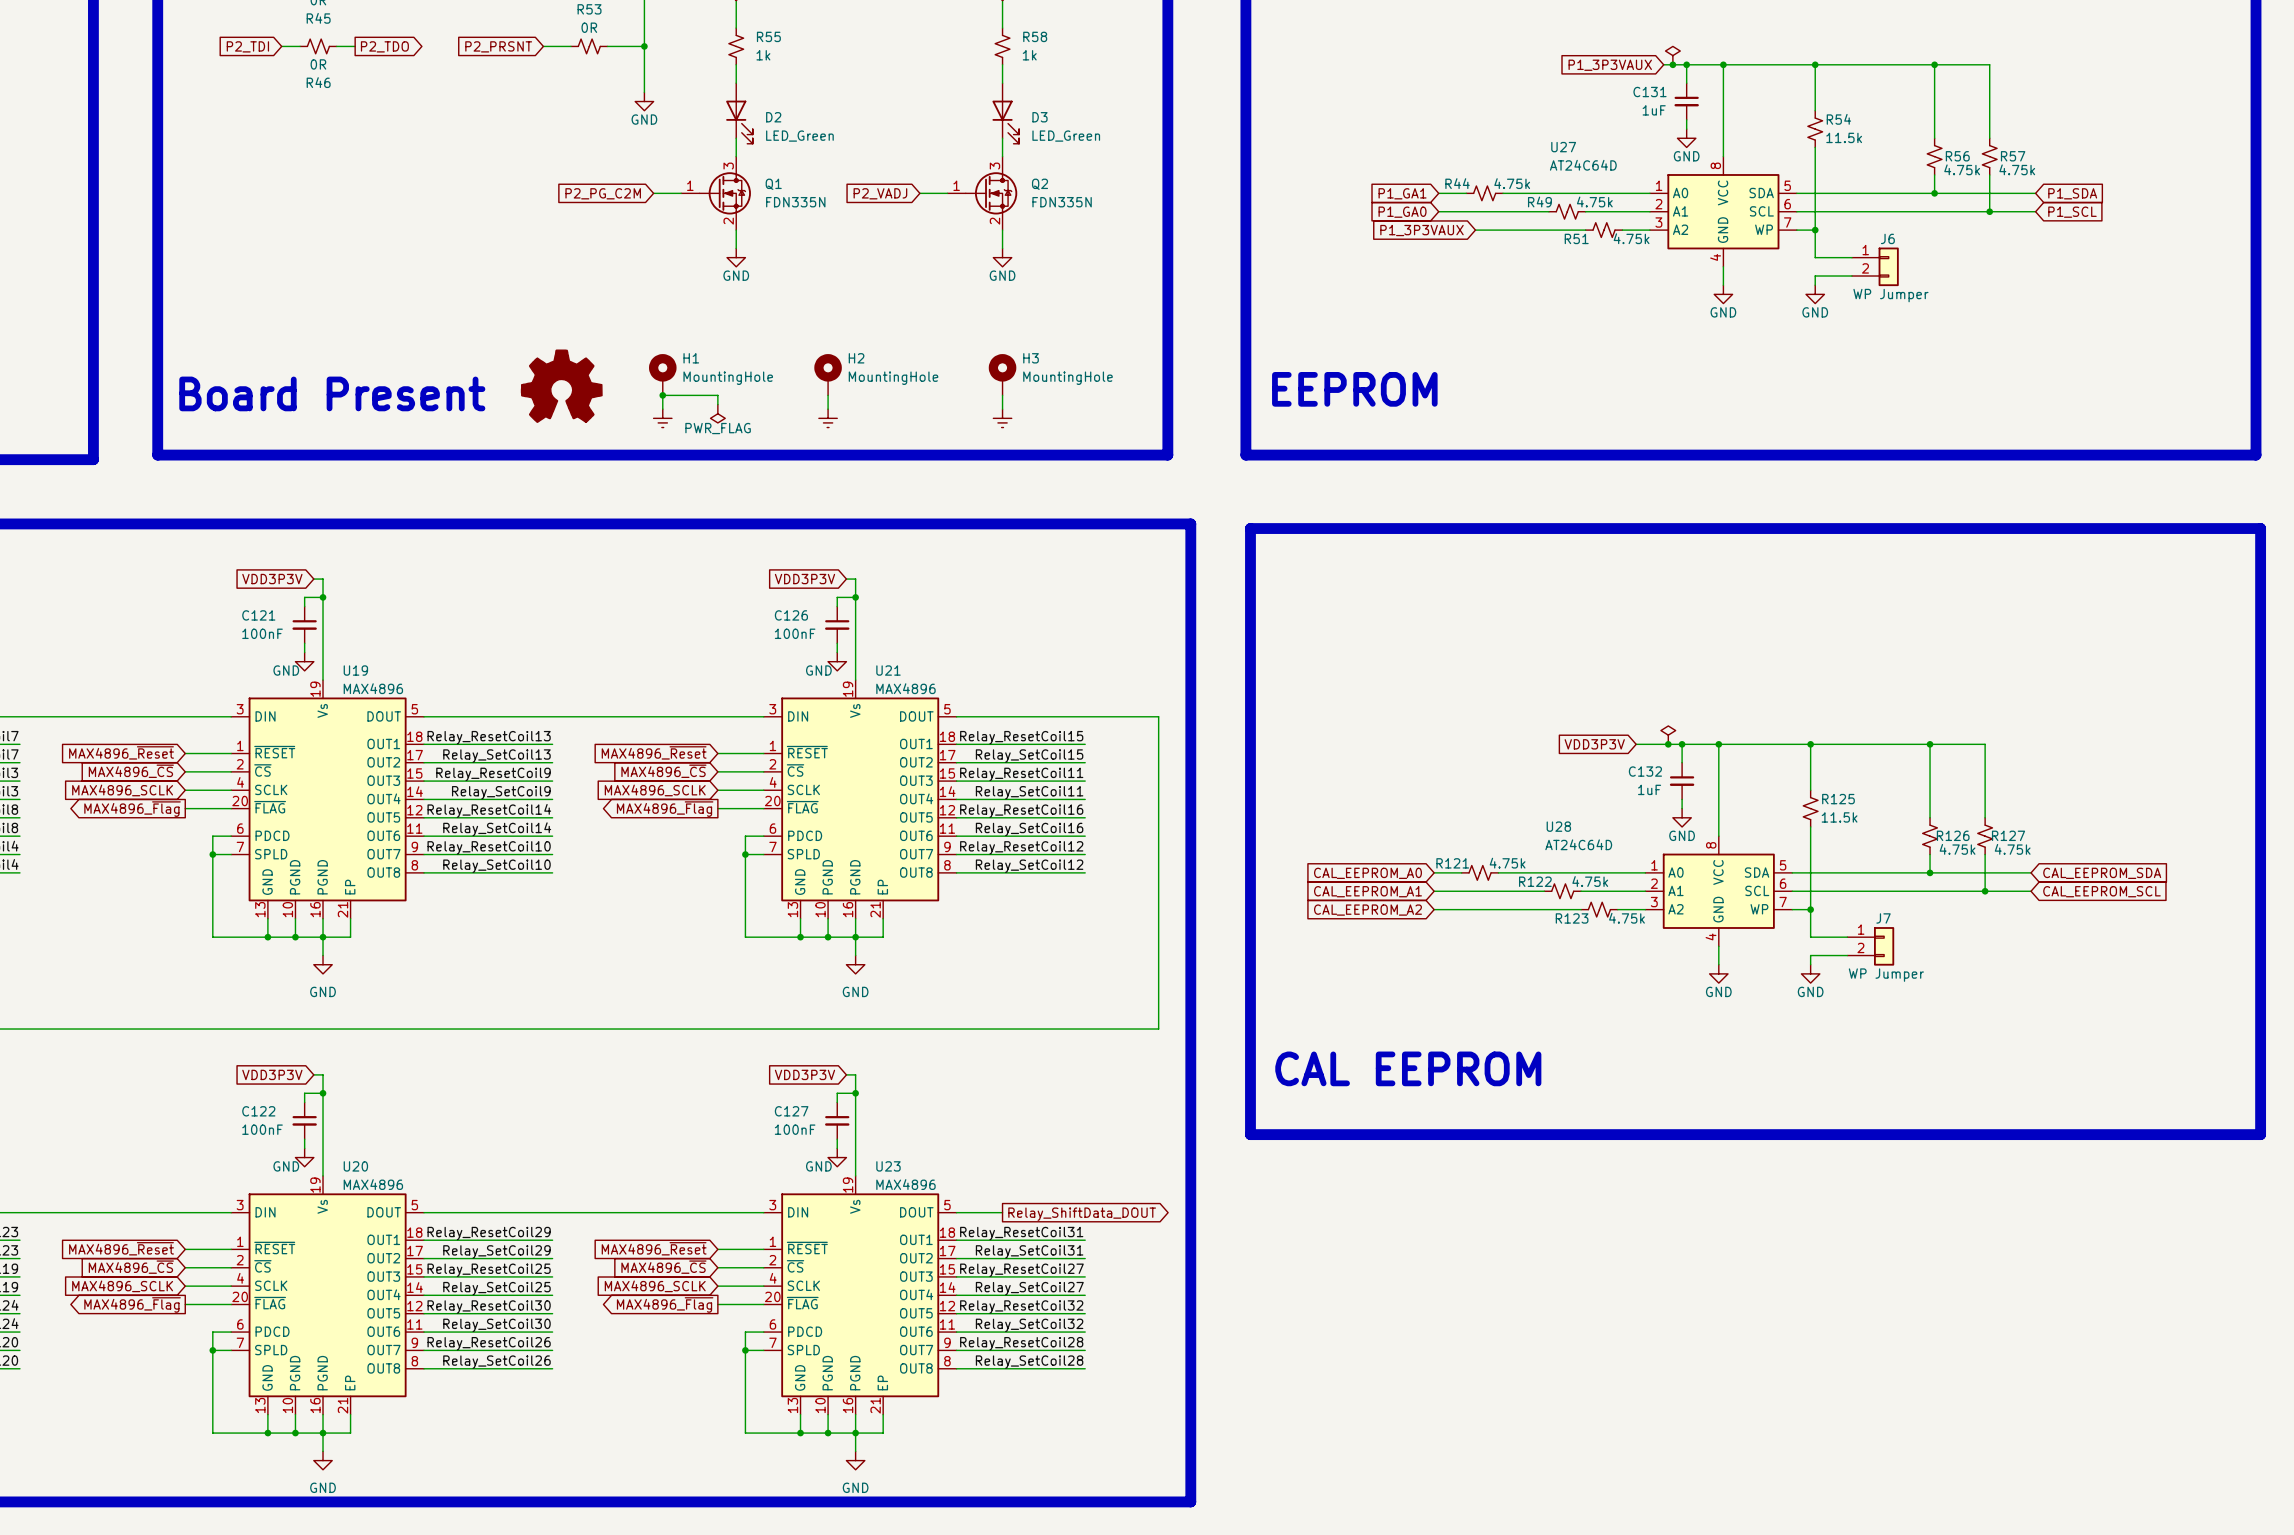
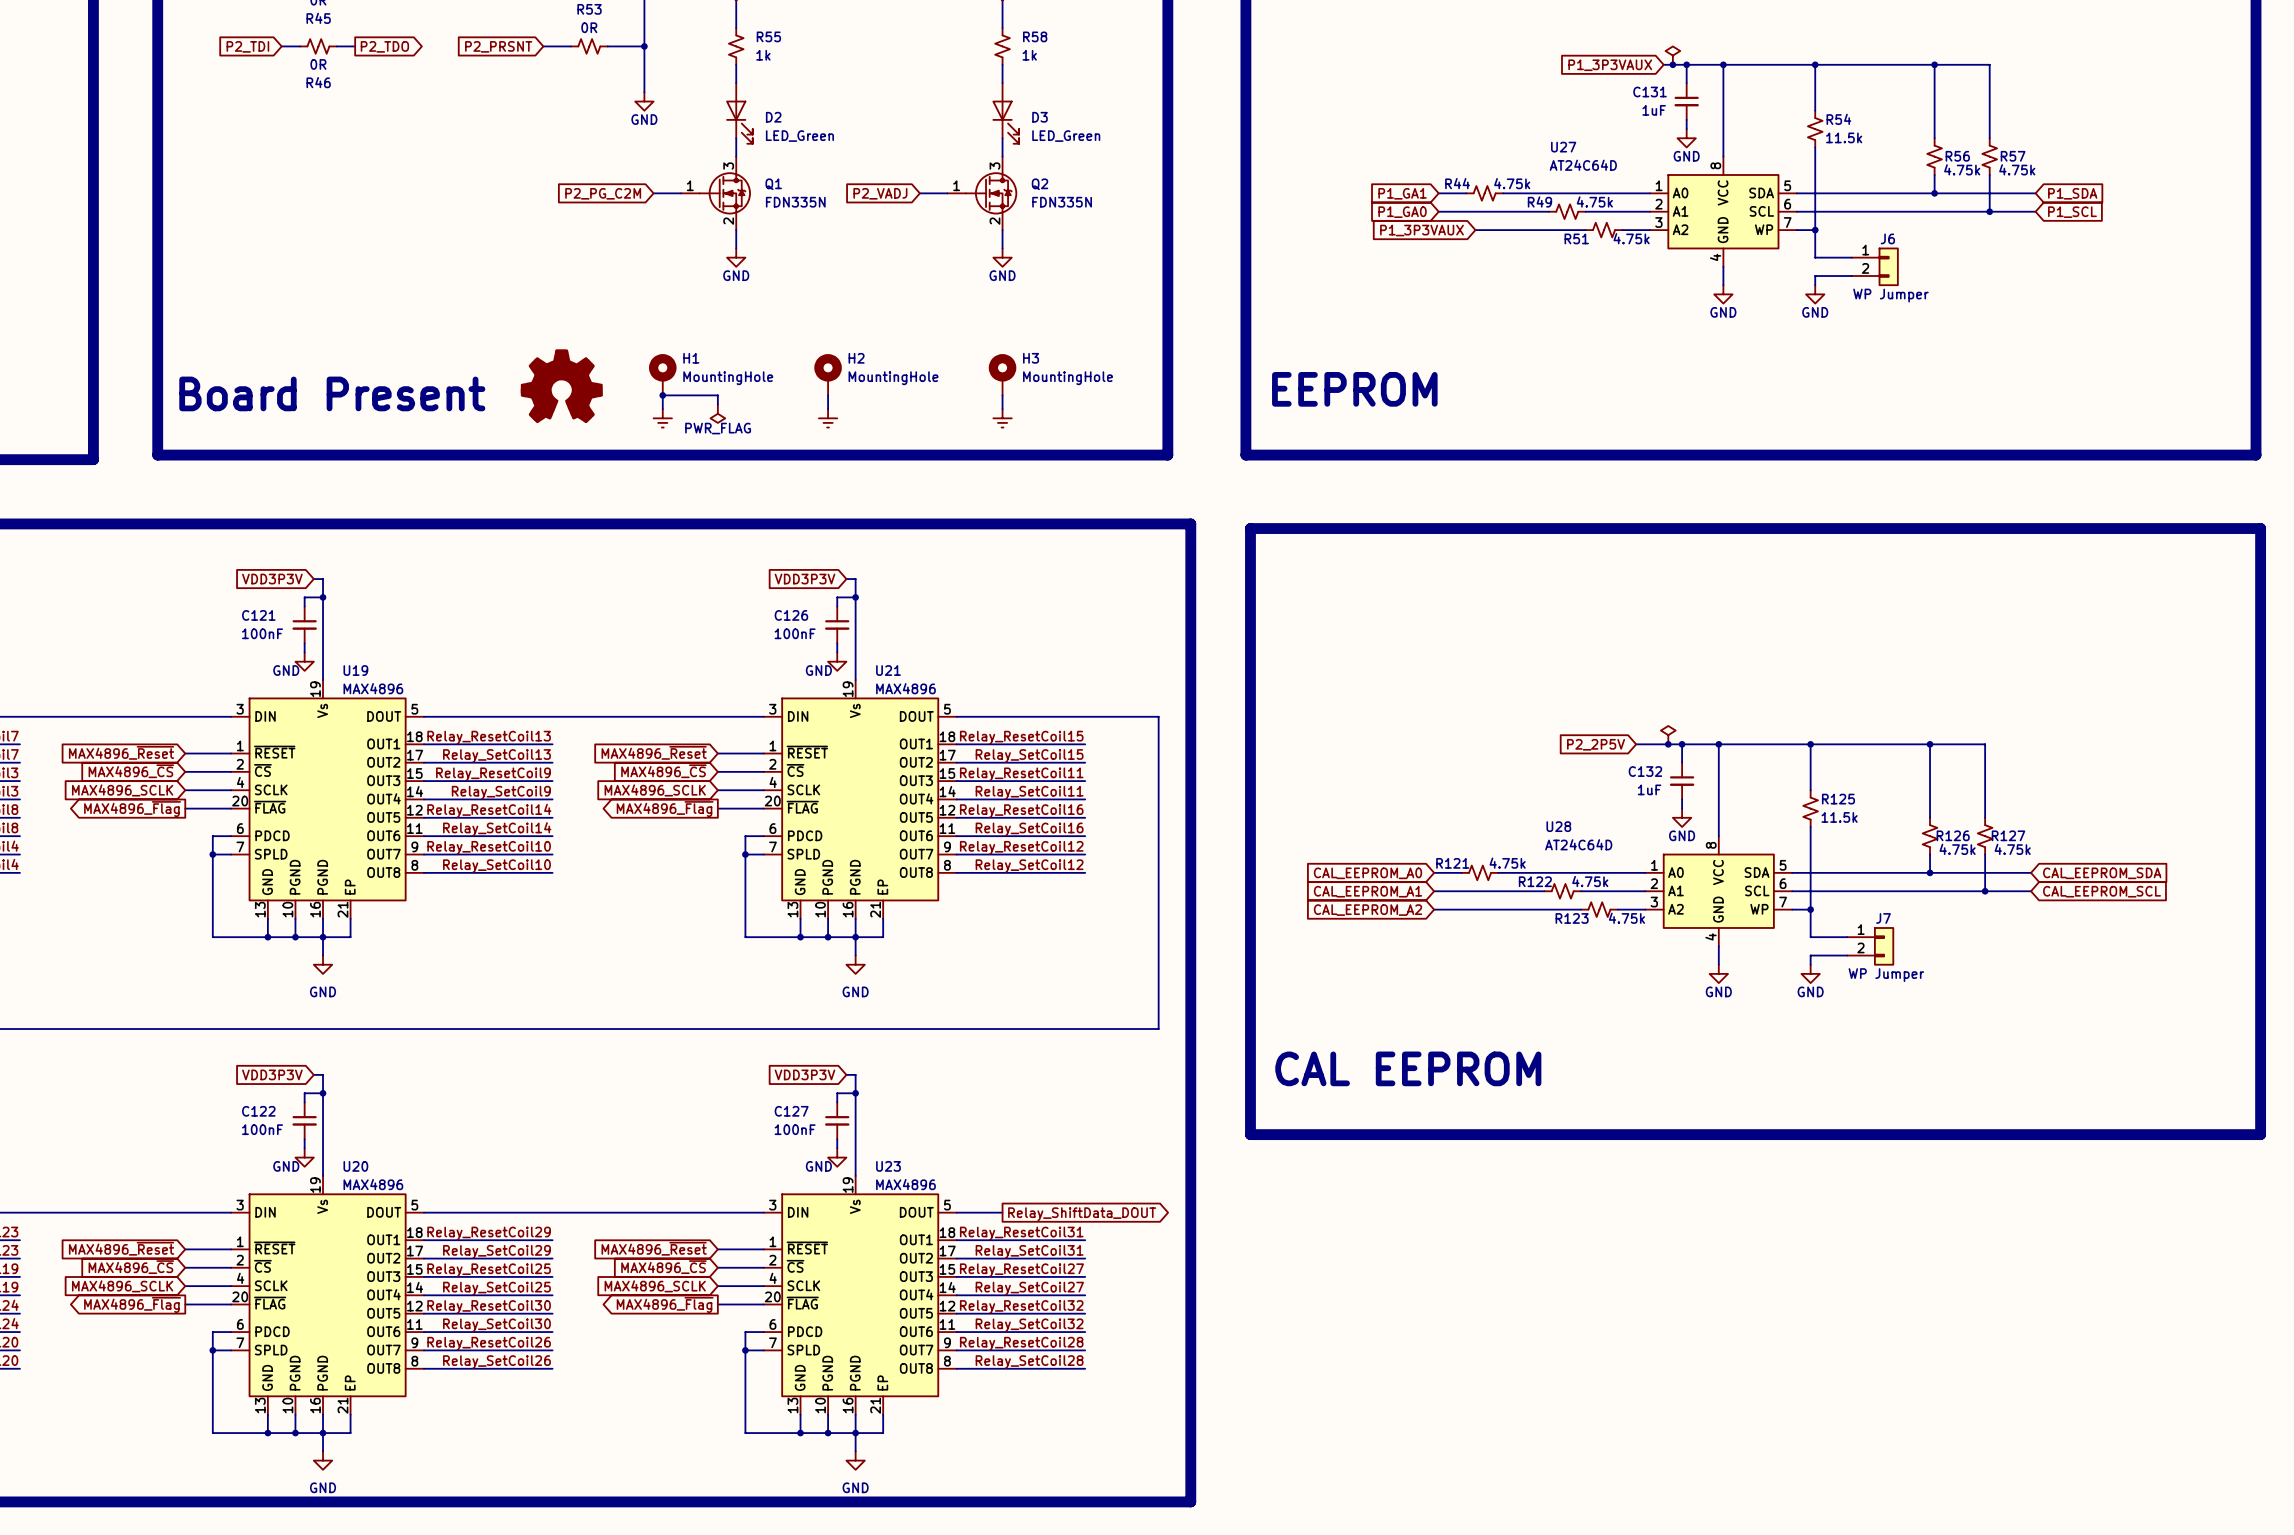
global label: VDD3P3V (1594, 744) -> P2_2P5V (1596, 744)

